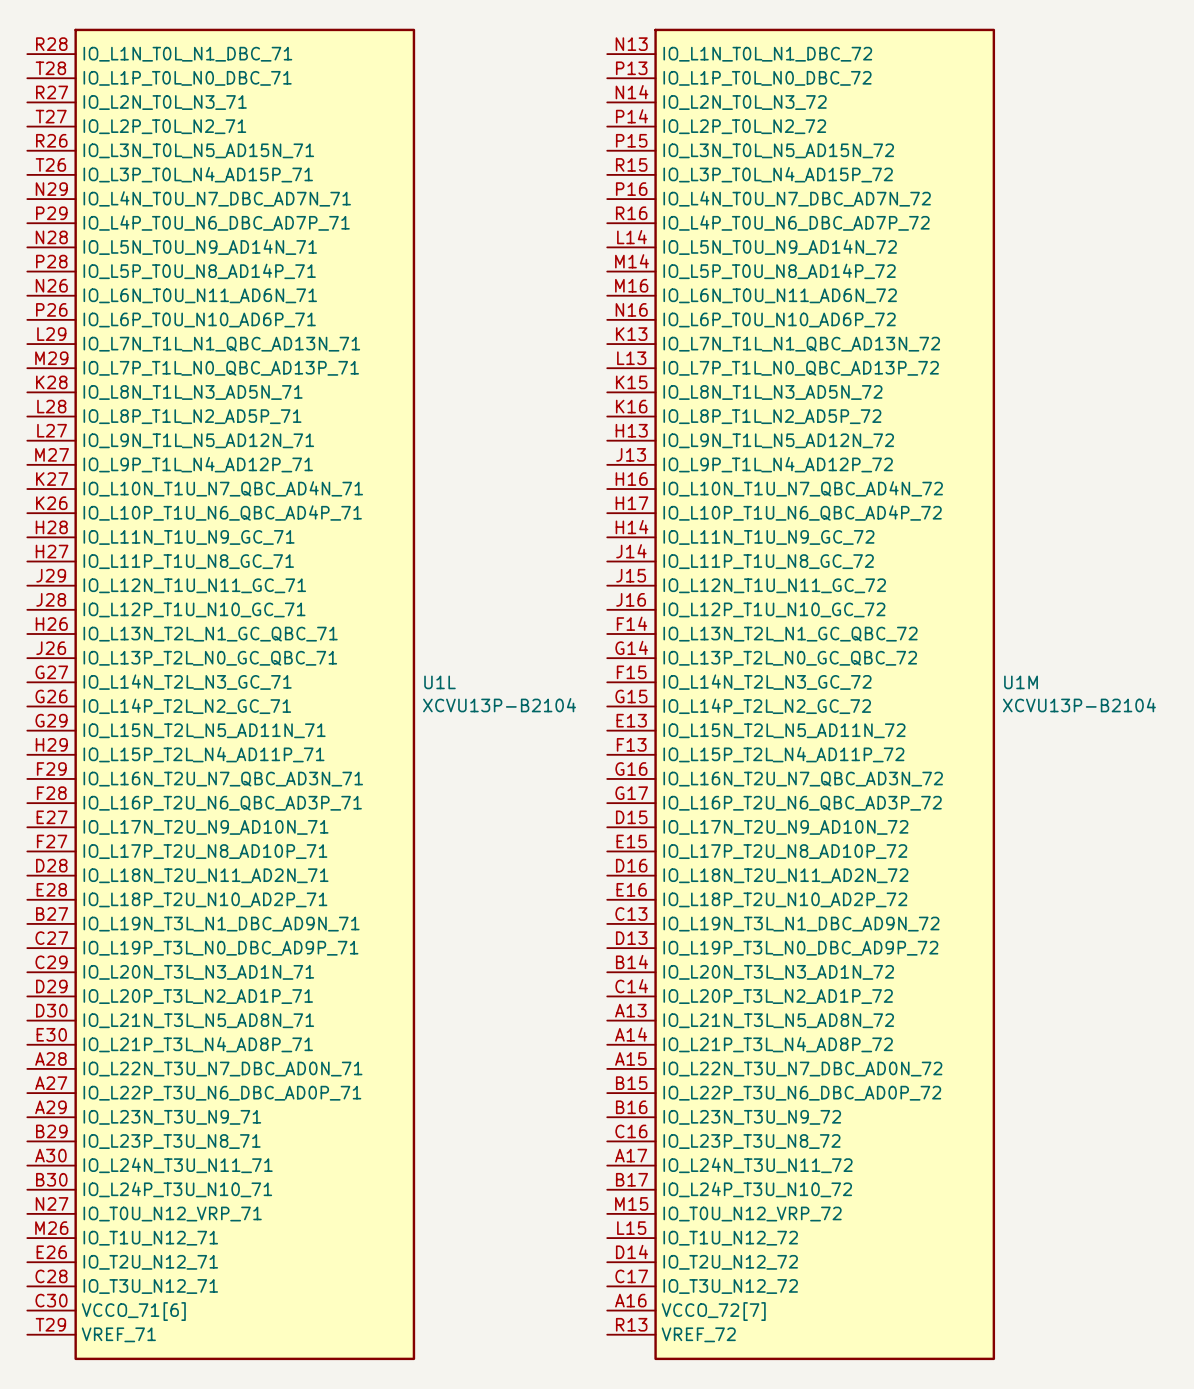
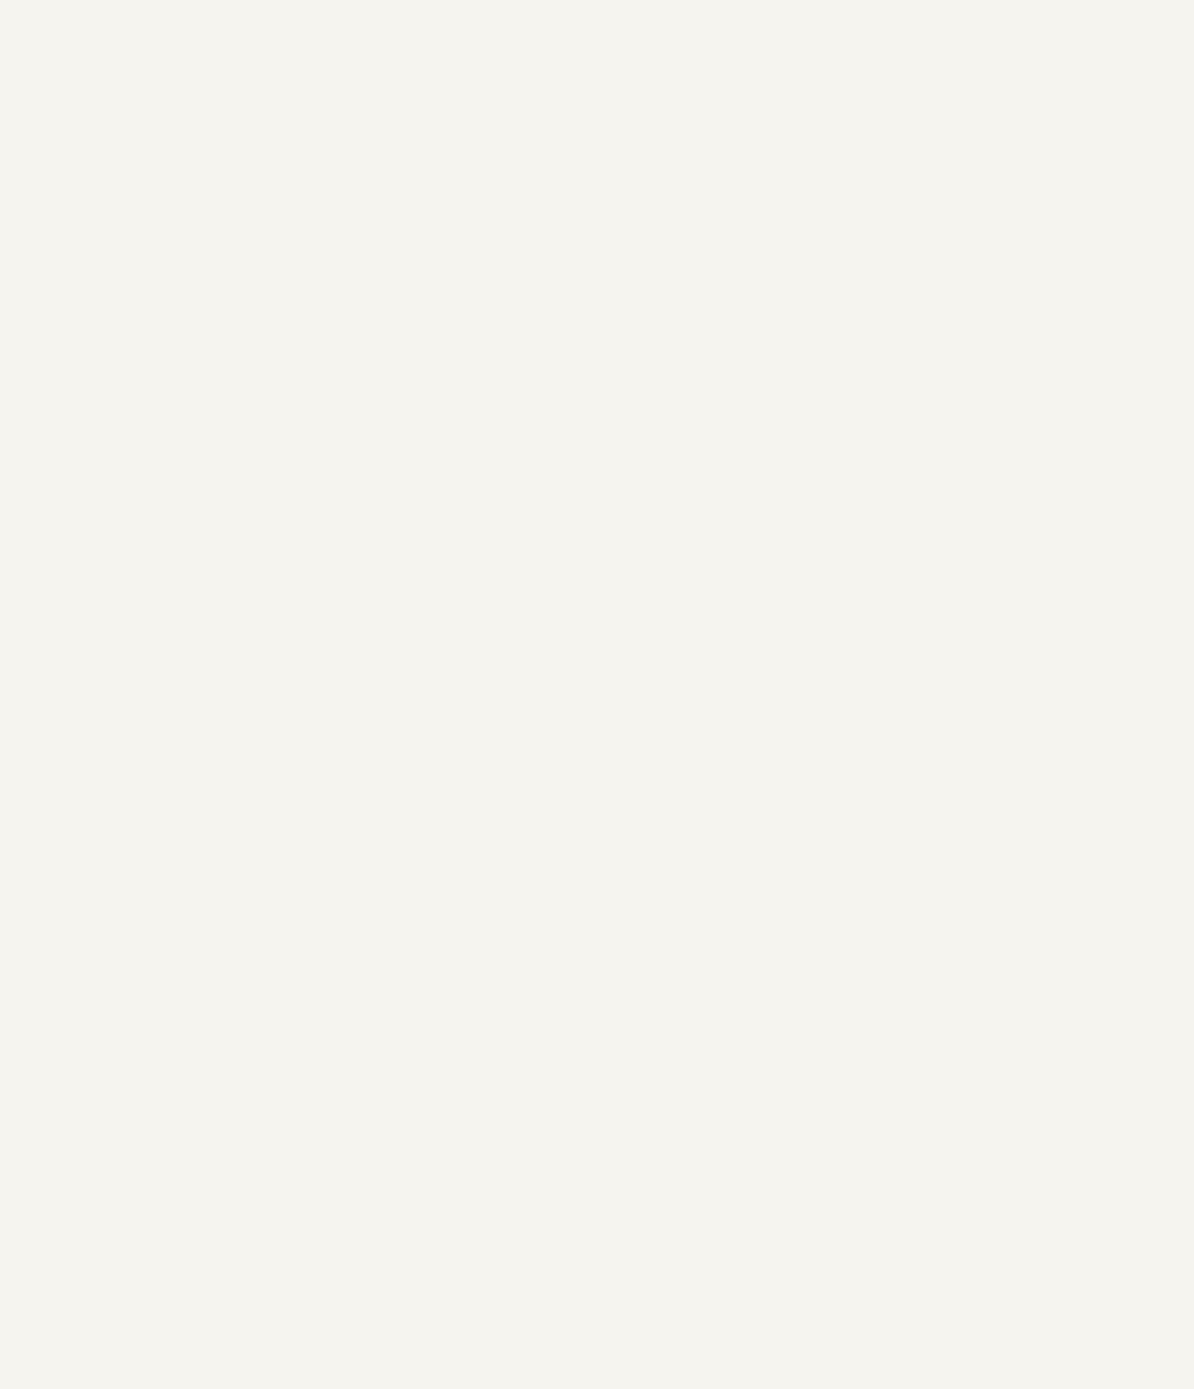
U1L: XCVU13P-B2104 (221, 694) -> none
U1M: XCVU13P-B2104 (801, 694) -> none

